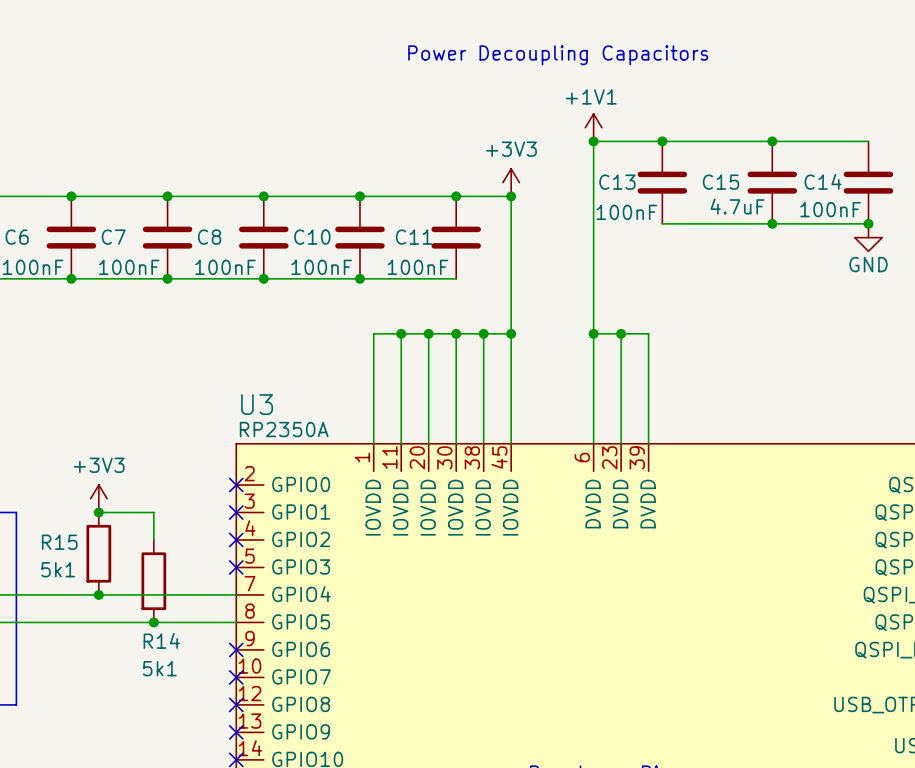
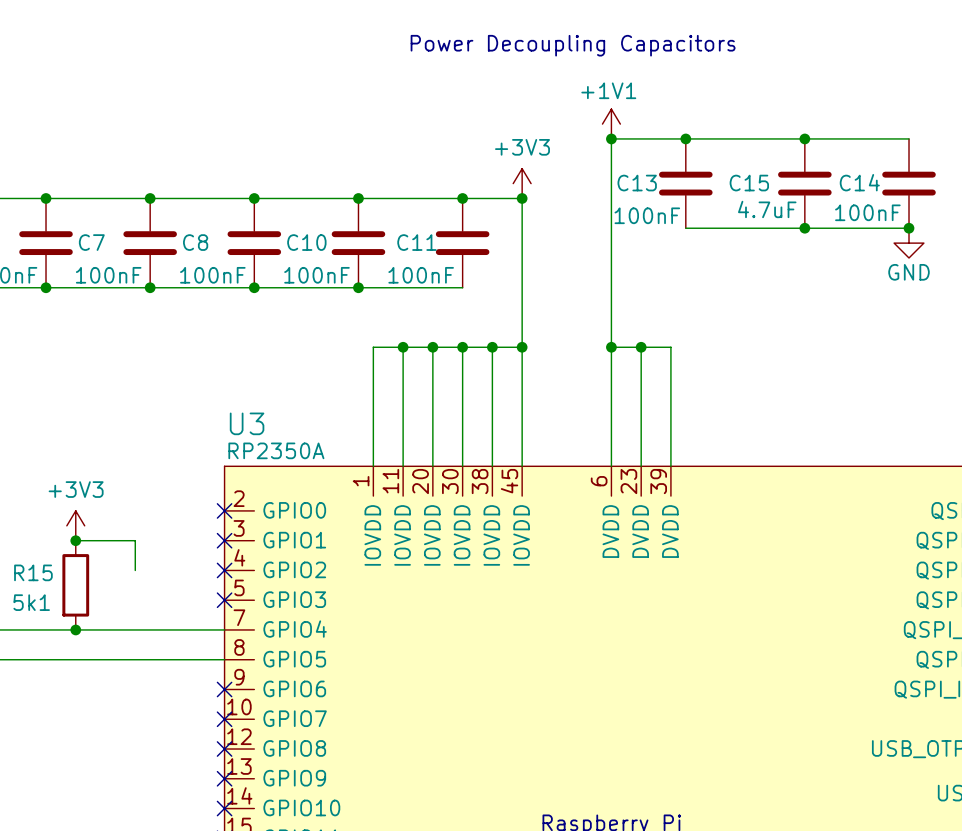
R14: 5k1 (153, 581) -> none
junction: (153, 622) -> none

